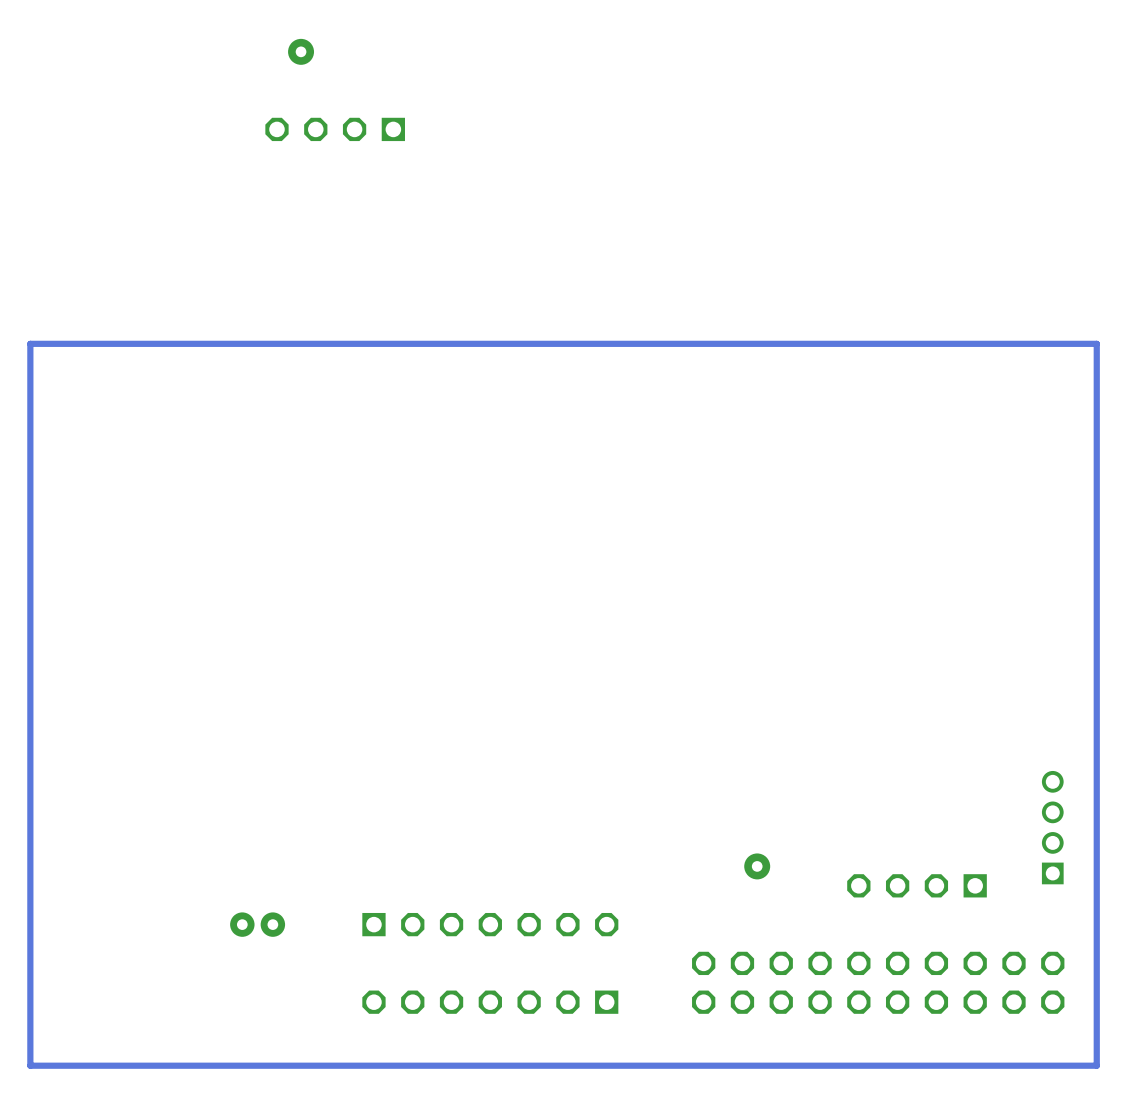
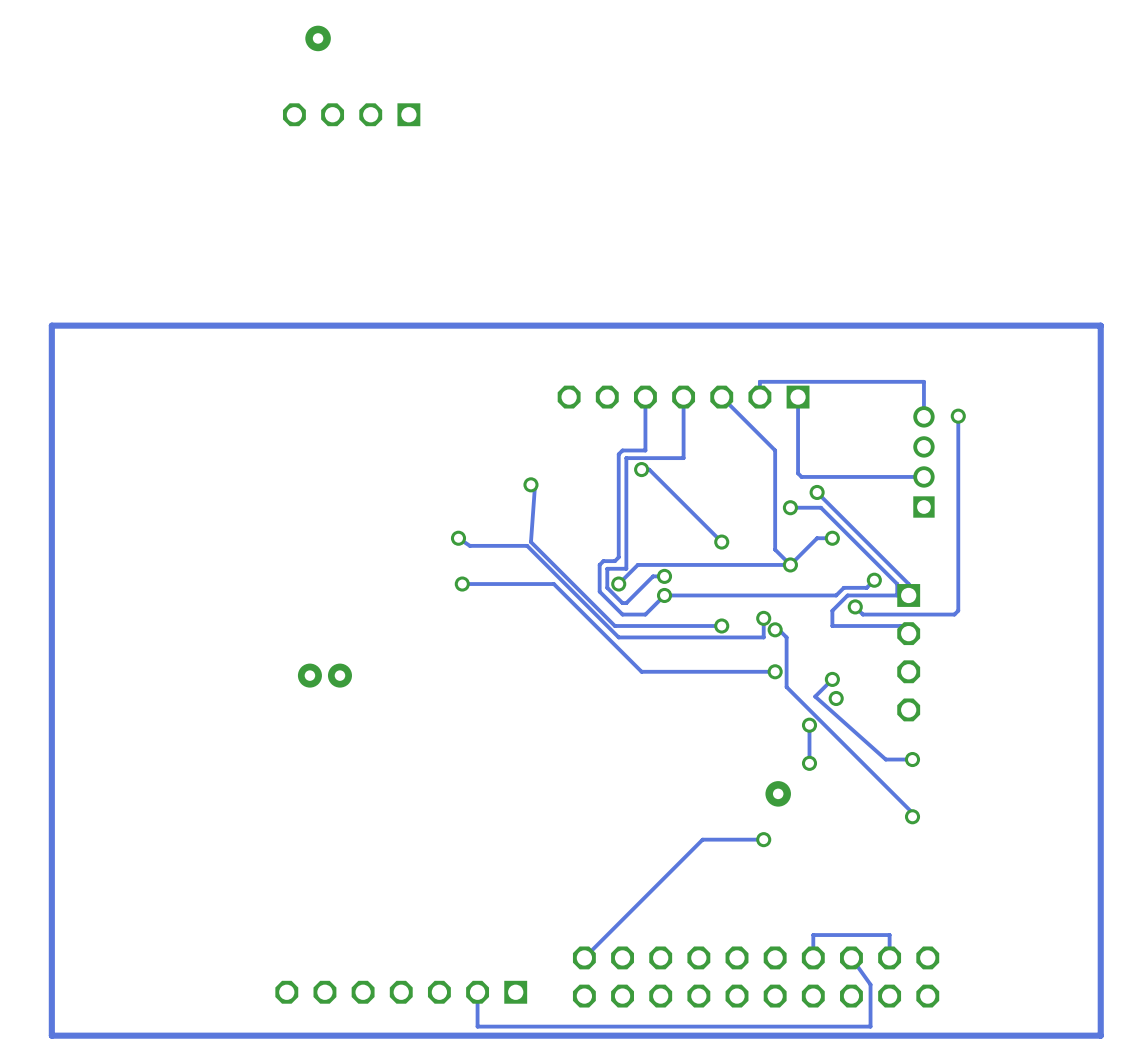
track: none -> (645, 397) (645, 450) (622, 450) (618, 454) (618, 557) (614, 561) (603, 561) (599, 564) (599, 591) (622, 614) (645, 614) (664, 595) (836, 595) (843, 587) (866, 587) (874, 580)
track: none -> (683, 397) (683, 458) (626, 458) (626, 568) (607, 568) (607, 587) (622, 603) (626, 603) (653, 576) (664, 576)
part: none -> (683, 397)
track: none -> (721, 397) (775, 450) (775, 549) (790, 564)
track: none -> (759, 397) (759, 381) (923, 381) (923, 416)
track: none -> (798, 397) (798, 473) (801, 476) (923, 476)
track: none -> (958, 416) (958, 610) (954, 614) (862, 614) (855, 606)
via: none -> (958, 416)
track: none -> (641, 469) (649, 469) (721, 542)
via: none -> (641, 469)
track: none -> (530, 484) (534, 488) (530, 542) (614, 625) (721, 625)
via: none -> (530, 484)
track: none -> (817, 492) (908, 584) (908, 595)
via: none -> (817, 492)
track: none -> (790, 507) (820, 507) (897, 584) (897, 595) (847, 595) (832, 610) (832, 625) (901, 625) (908, 633)
via: none -> (790, 507)
track: none -> (458, 538) (469, 545) (527, 545) (618, 637) (763, 637) (763, 618)
via: none -> (458, 538)
track: none -> (832, 538) (817, 538) (790, 564)
via: none -> (832, 538)
via: none -> (721, 542)
track: none -> (790, 564) (637, 564) (618, 584) (614, 584)
via: none -> (790, 564)
via: none -> (664, 576)
via: none -> (874, 580)
track: none -> (462, 584) (553, 584) (641, 671) (775, 671)
via: none -> (462, 584)
via: none -> (618, 584)
via: none -> (664, 595)
via: none -> (855, 606)
via: none -> (763, 618)
via: none -> (721, 625)
track: none -> (775, 629) (778, 629) (786, 637) (786, 687) (912, 812) (912, 816)
via: none -> (775, 629)
via: none -> (775, 671)
track: none -> (832, 679) (815, 696) (885, 759) (912, 759)
via: none -> (832, 679)
via: none -> (836, 698)
track: none -> (809, 725) (809, 763)
via: none -> (809, 725)
via: none -> (912, 759)
via: none -> (809, 763)
part position: (1052, 827) -> (923, 461)
via: none -> (912, 816)
track: none -> (763, 839) (702, 839) (584, 957)
via: none -> (763, 839)
part position: (757, 866) -> (778, 793)
part rotation: 0° (917, 885) -> 90° counterclockwise (908, 652)
part position: (917, 885) -> (908, 652)
part position: (257, 924) -> (324, 675)
part: (490, 924) -> none
part position: (878, 982) -> (756, 977)
track: none -> (851, 957) (870, 984) (870, 1026) (477, 1026) (477, 992)
track: none -> (889, 957) (889, 935) (813, 935) (813, 957)
part: (490, 1002) -> none
part: none -> (401, 992)

